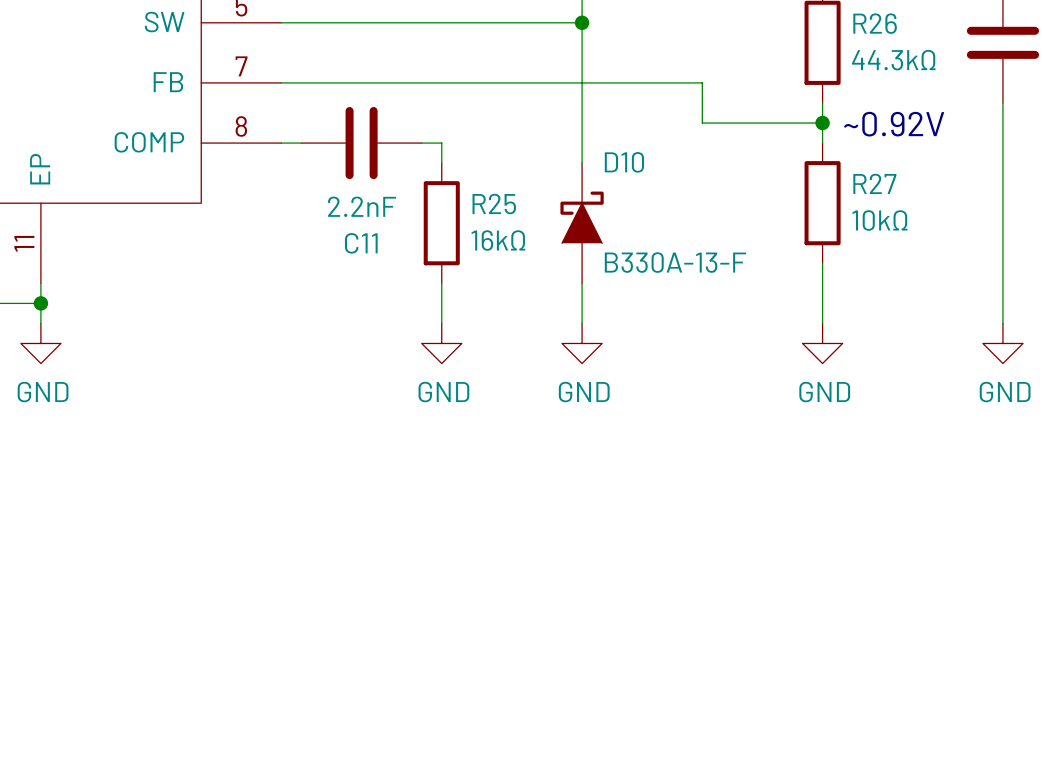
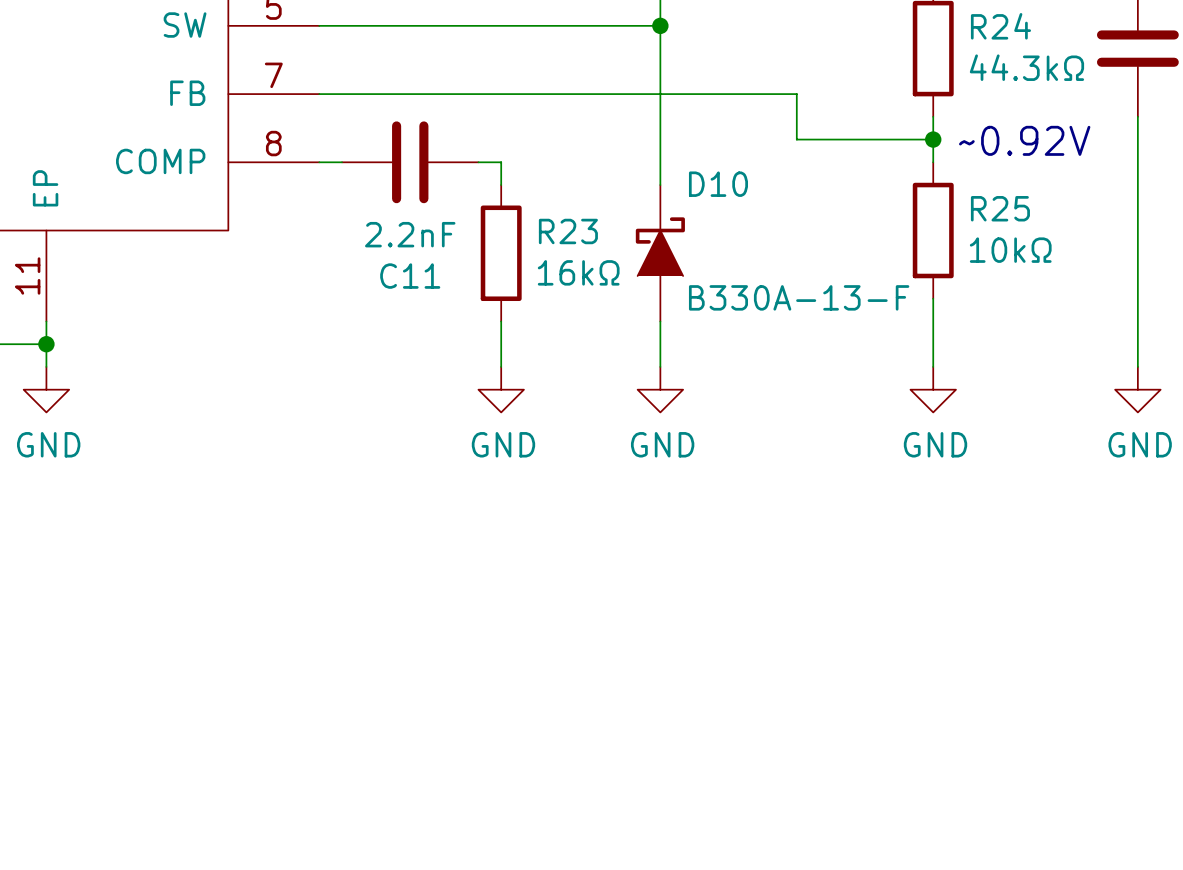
R26 name: R26 (875, 23) -> R24 (1000, 26)
R27 name: R27 (874, 183) -> R25 (1000, 208)
R25 name: R25 (494, 204) -> R23 (568, 231)

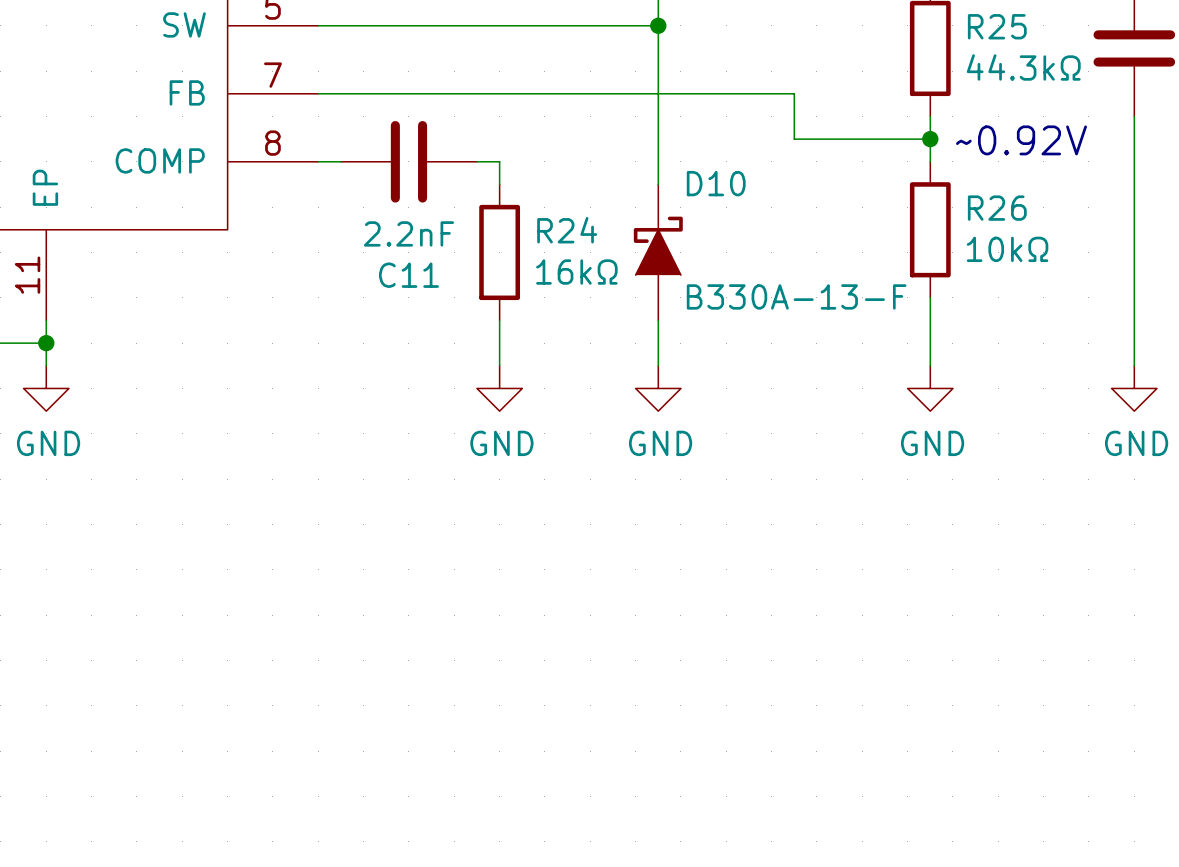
R24 name: R24 (1000, 26) -> R25 (997, 26)
R25 name: R25 (1000, 208) -> R26 (997, 208)
R23 name: R23 (568, 231) -> R24 (567, 230)

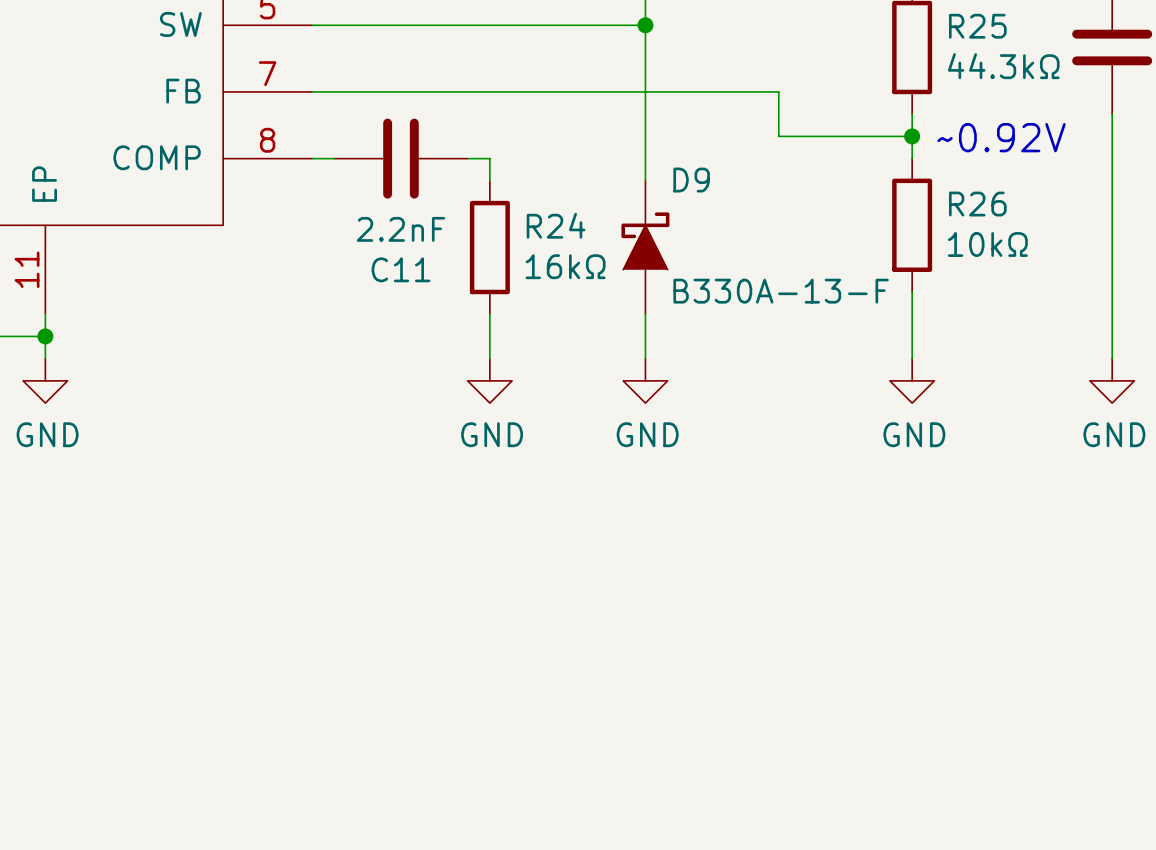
D10 name: D10 (716, 183) -> D9 (691, 180)

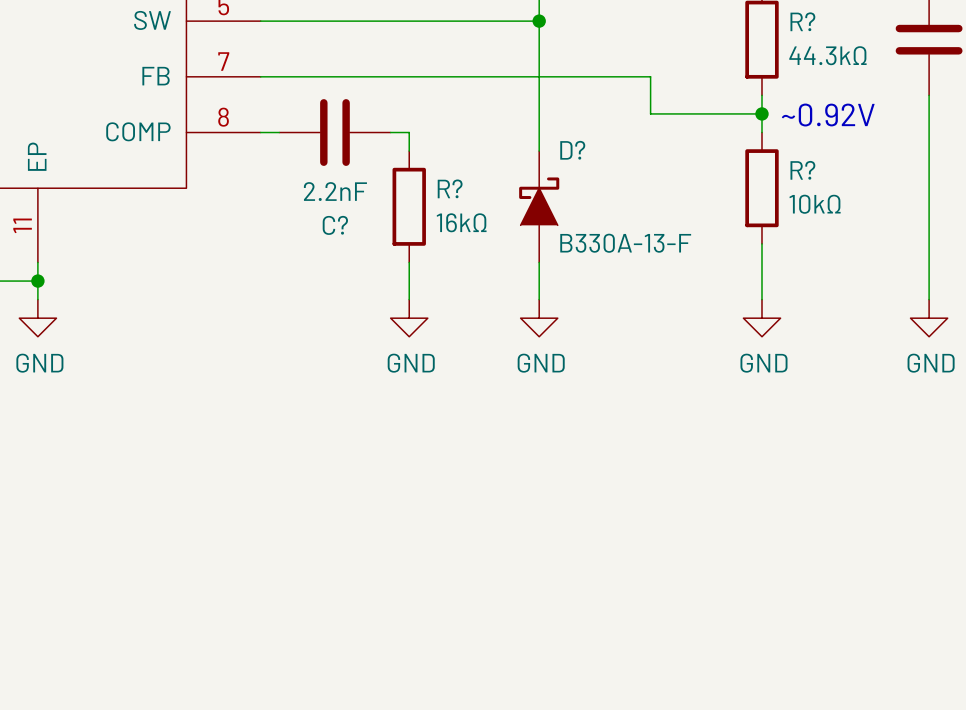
R25 name: R25 (977, 26) -> R? (802, 21)
D9 name: D9 (691, 180) -> D? (572, 150)
R26 name: R26 (977, 204) -> R? (802, 170)
R24 name: R24 (556, 225) -> R? (450, 188)
C11 name: C11 (400, 269) -> C? (335, 225)

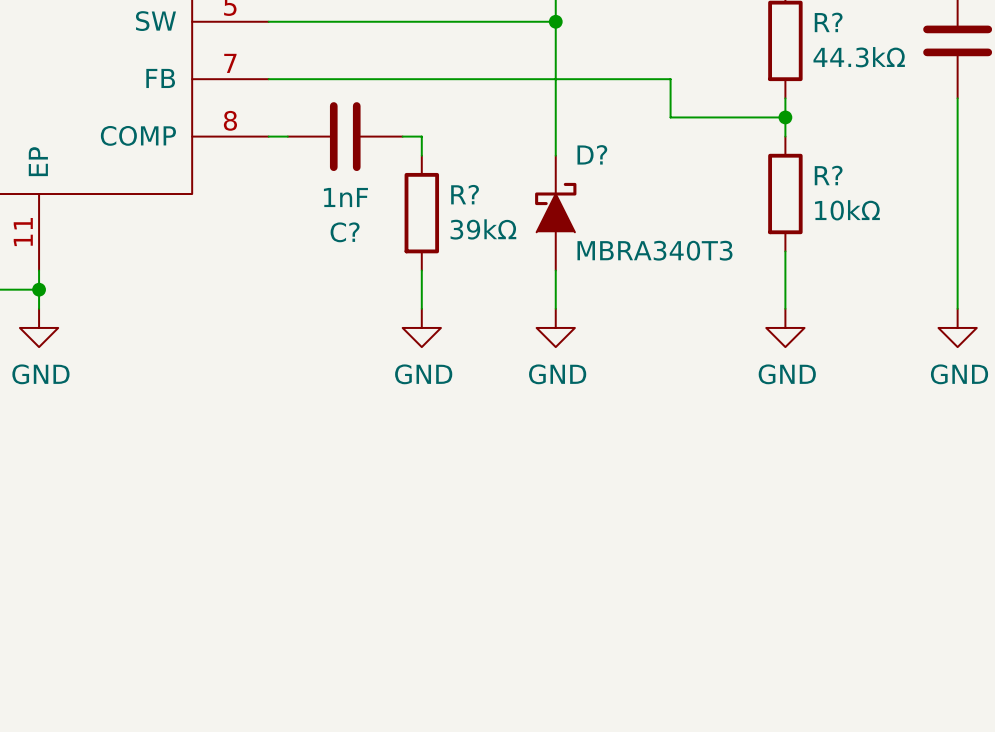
text: ~0.92V (828, 115) -> none
C? value: 2.2nF (335, 191) -> 1nF (345, 197)
R? value: 16kΩ (461, 222) -> 39kΩ (483, 229)
D? value: B330A-13-F (625, 243) -> MBRA340T3 (654, 250)

